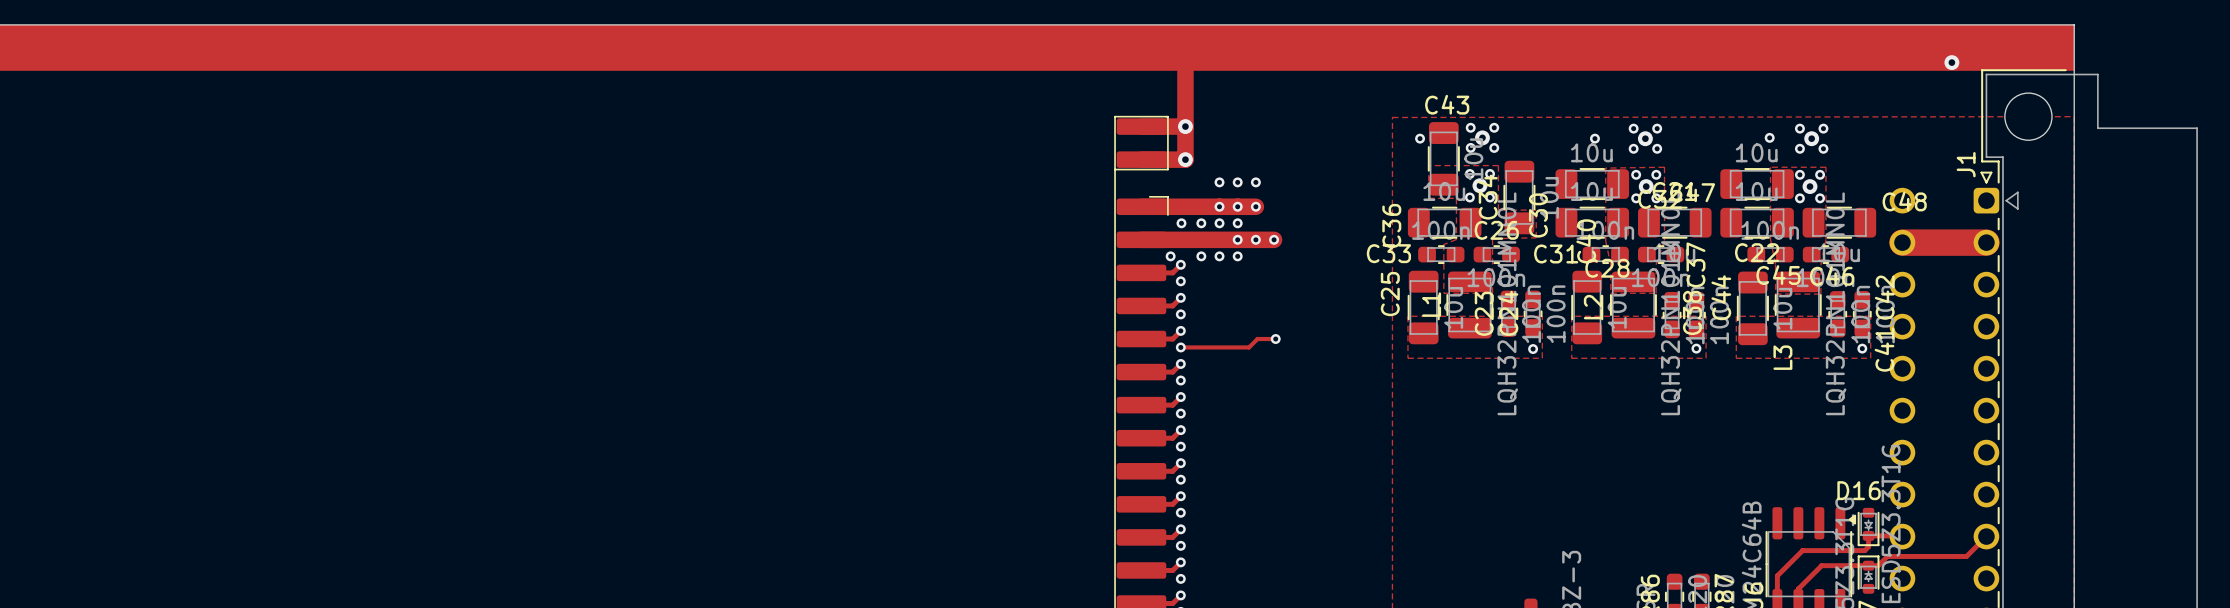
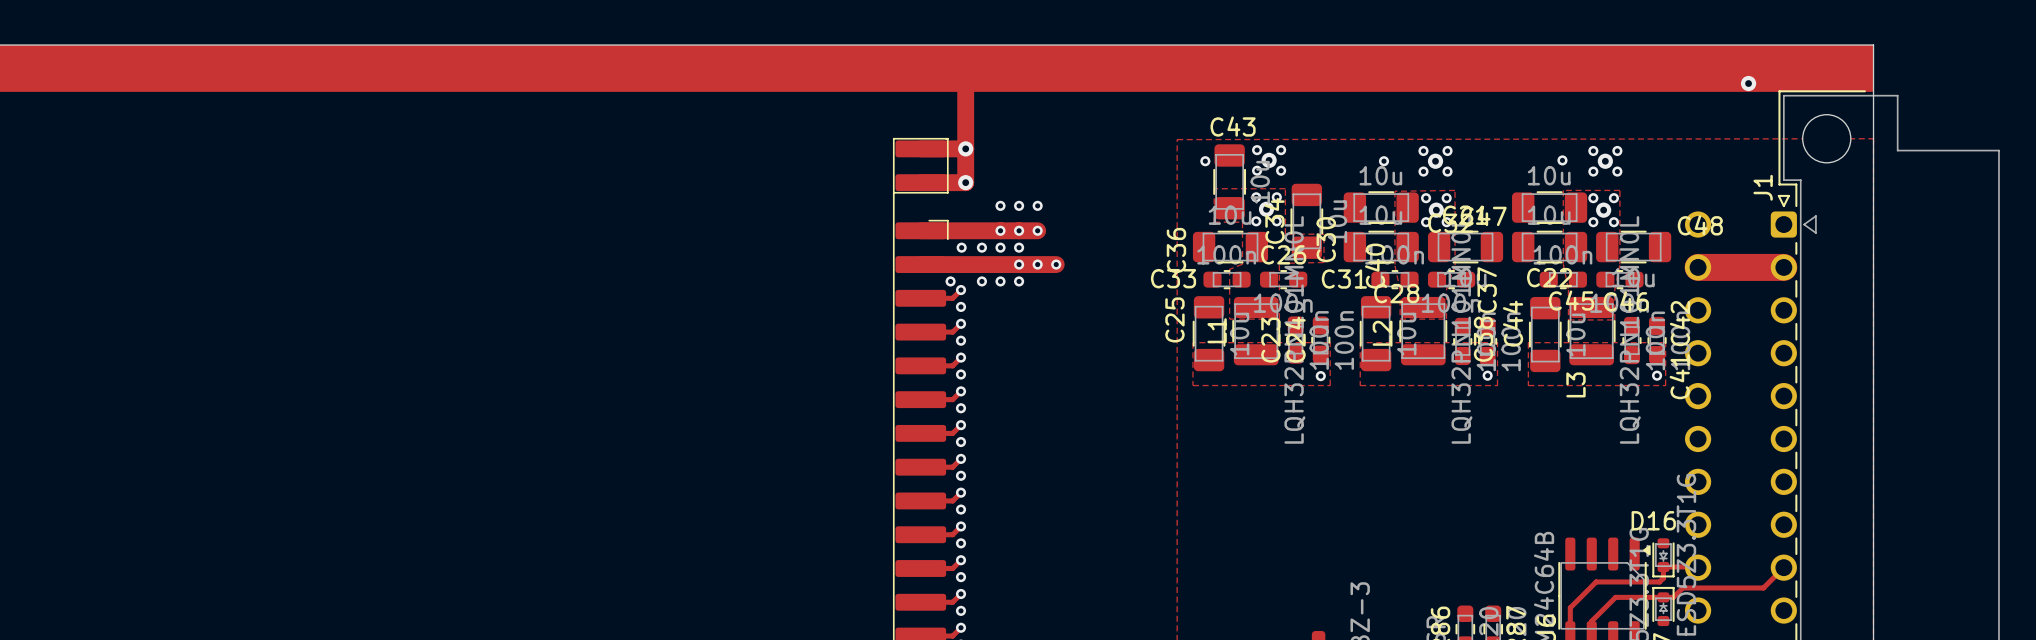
track: (1275, 339) (1257, 339) (1249, 347) (1180, 347) -> none
via: (1275, 339) -> none

